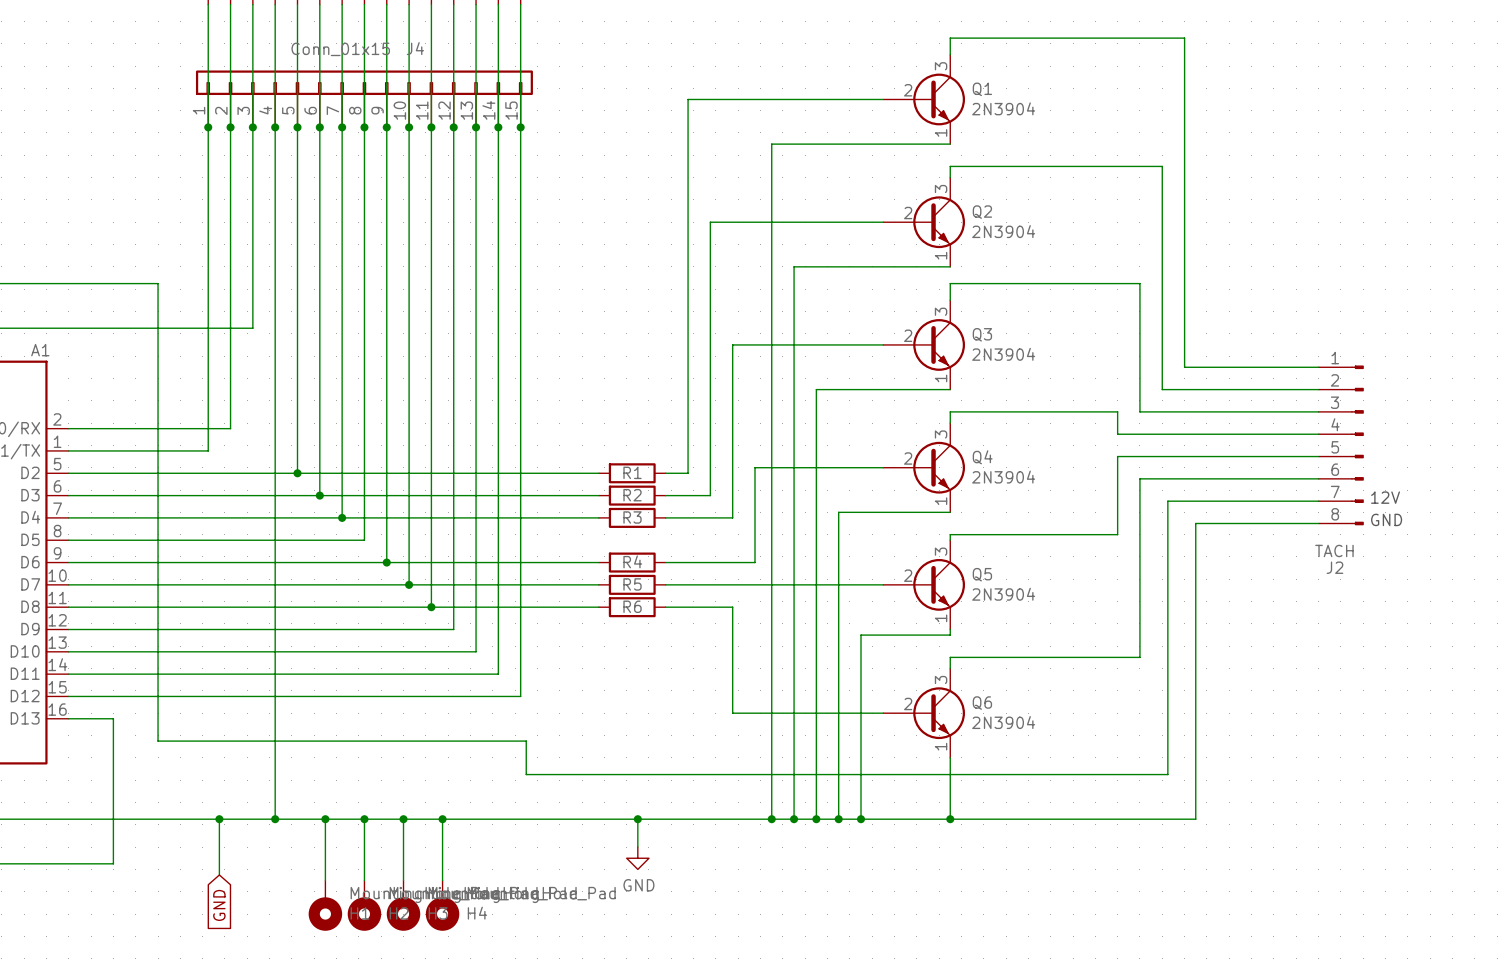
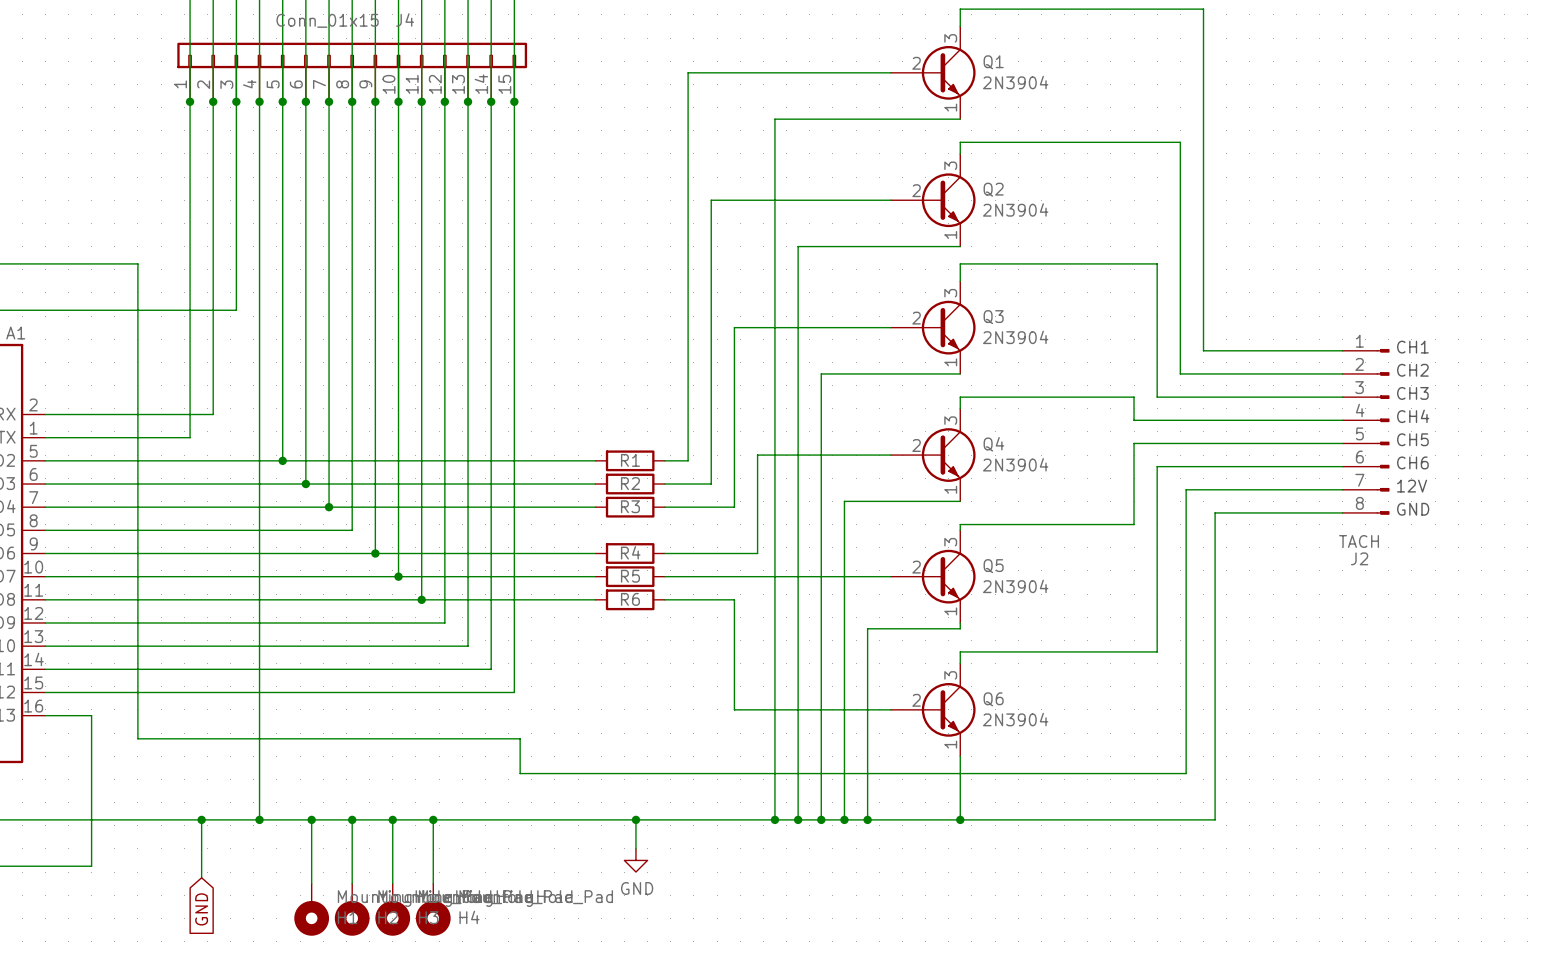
text: none -> CH1 (1412, 347)
text: none -> CH2 (1412, 370)
text: none -> CH3 (1412, 393)
text: none -> CH4 (1413, 416)
text: none -> CH5 (1412, 439)
text: none -> CH6 (1412, 462)

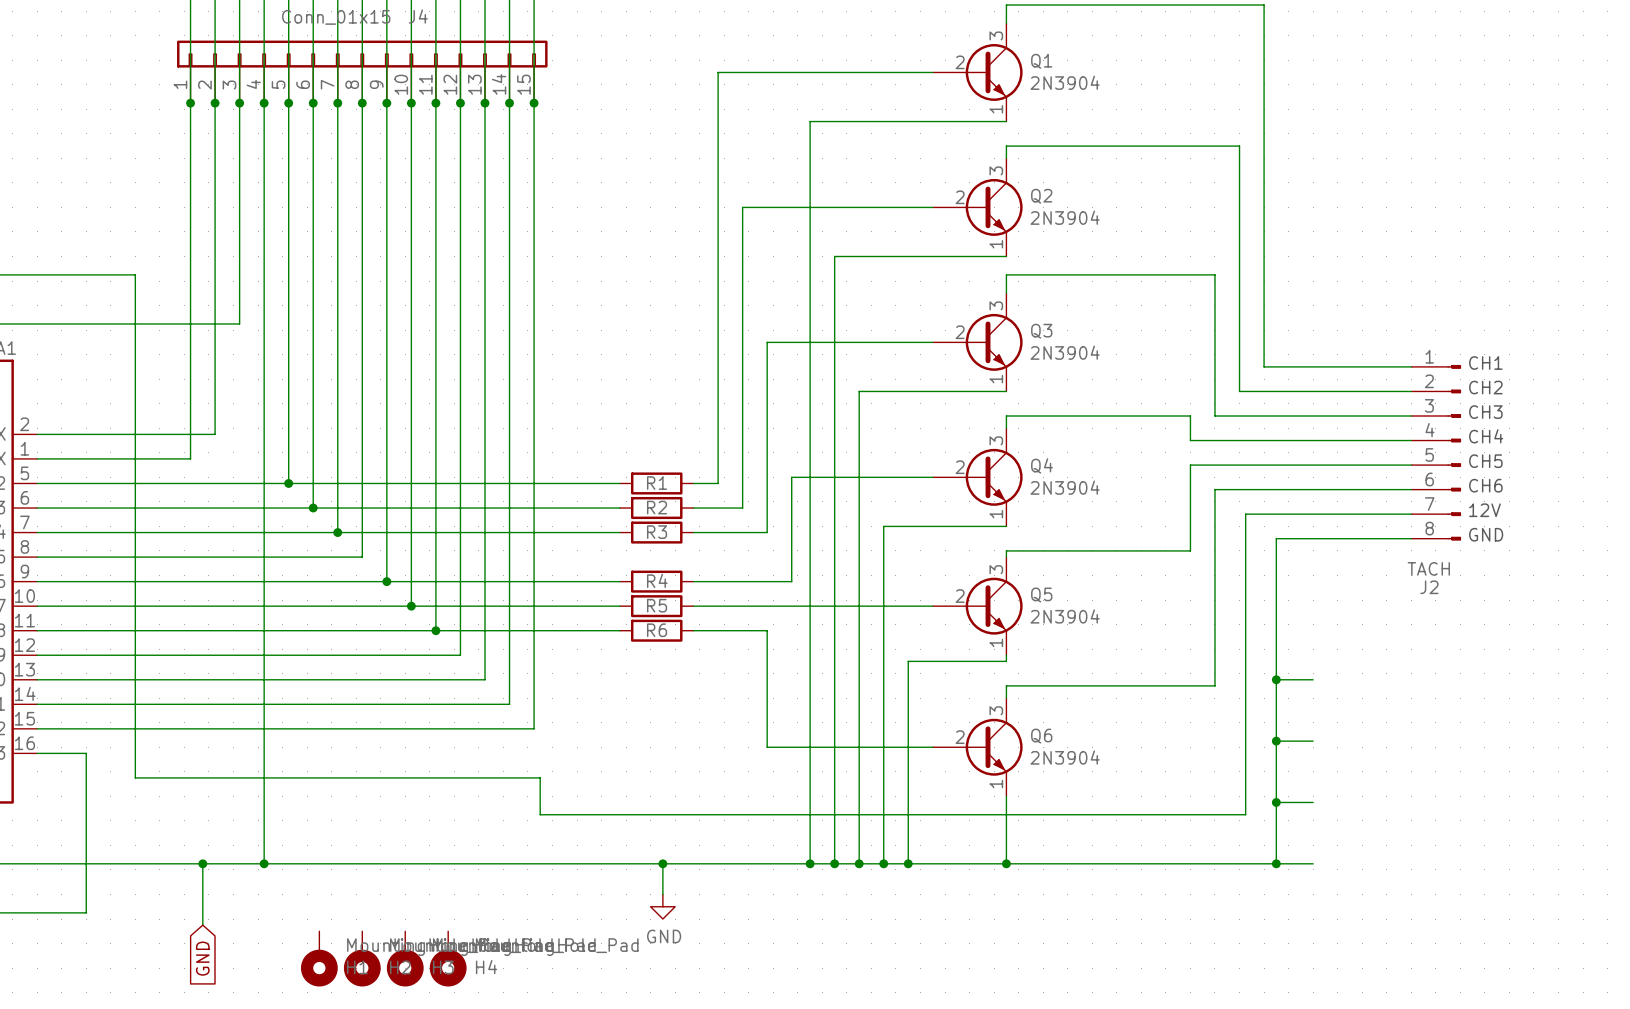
wire: none -> (1276, 679) (1313, 679)
junction: none -> (1276, 679)
wire: none -> (1276, 741) (1313, 741)
junction: none -> (1276, 741)
wire: none -> (1276, 802) (1313, 802)
junction: none -> (1276, 802)
wire: (311, 819) (311, 883) -> none
junction: (311, 819) -> none
wire: (352, 819) (352, 883) -> none
junction: (352, 819) -> none
wire: (392, 819) (392, 883) -> none
junction: (392, 819) -> none
wire: (433, 819) (433, 883) -> none
junction: (433, 819) -> none
wire: none -> (1276, 863) (1313, 863)
junction: none -> (1276, 863)

